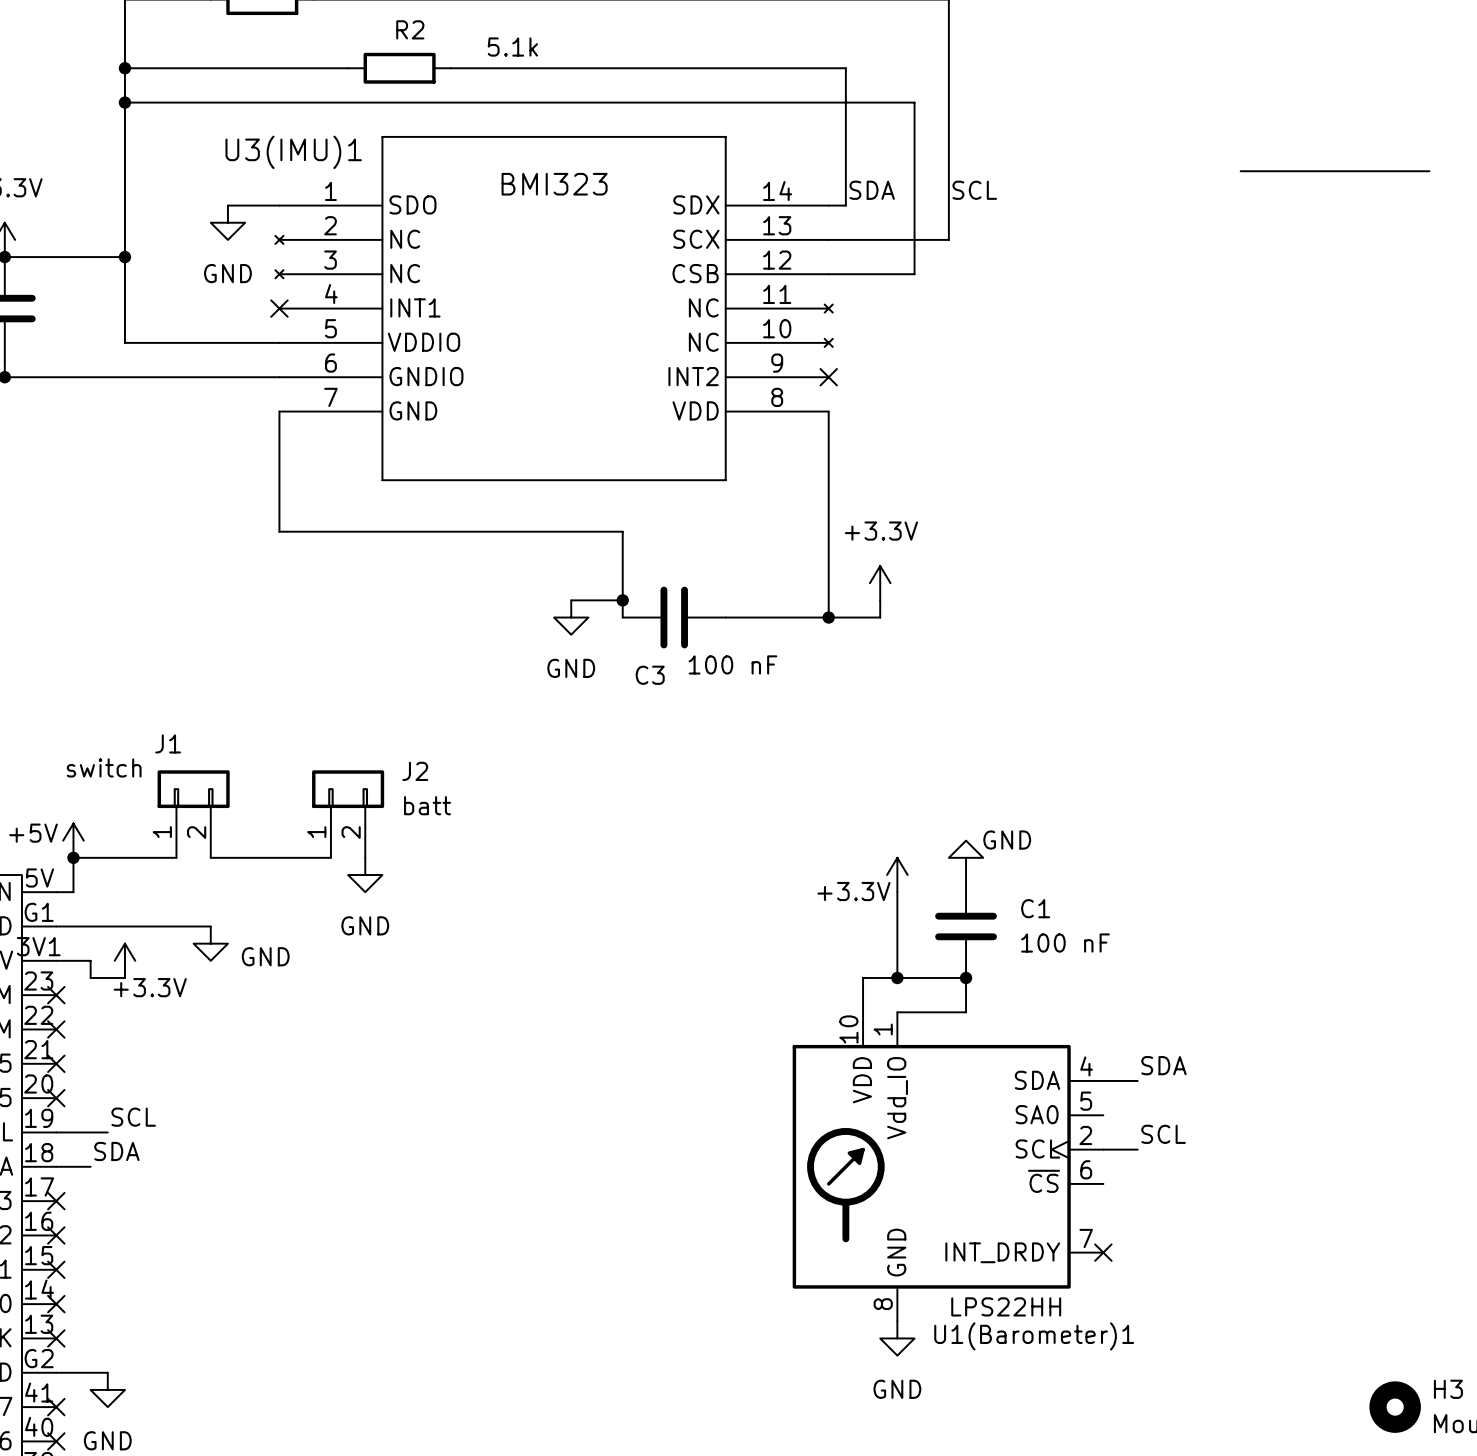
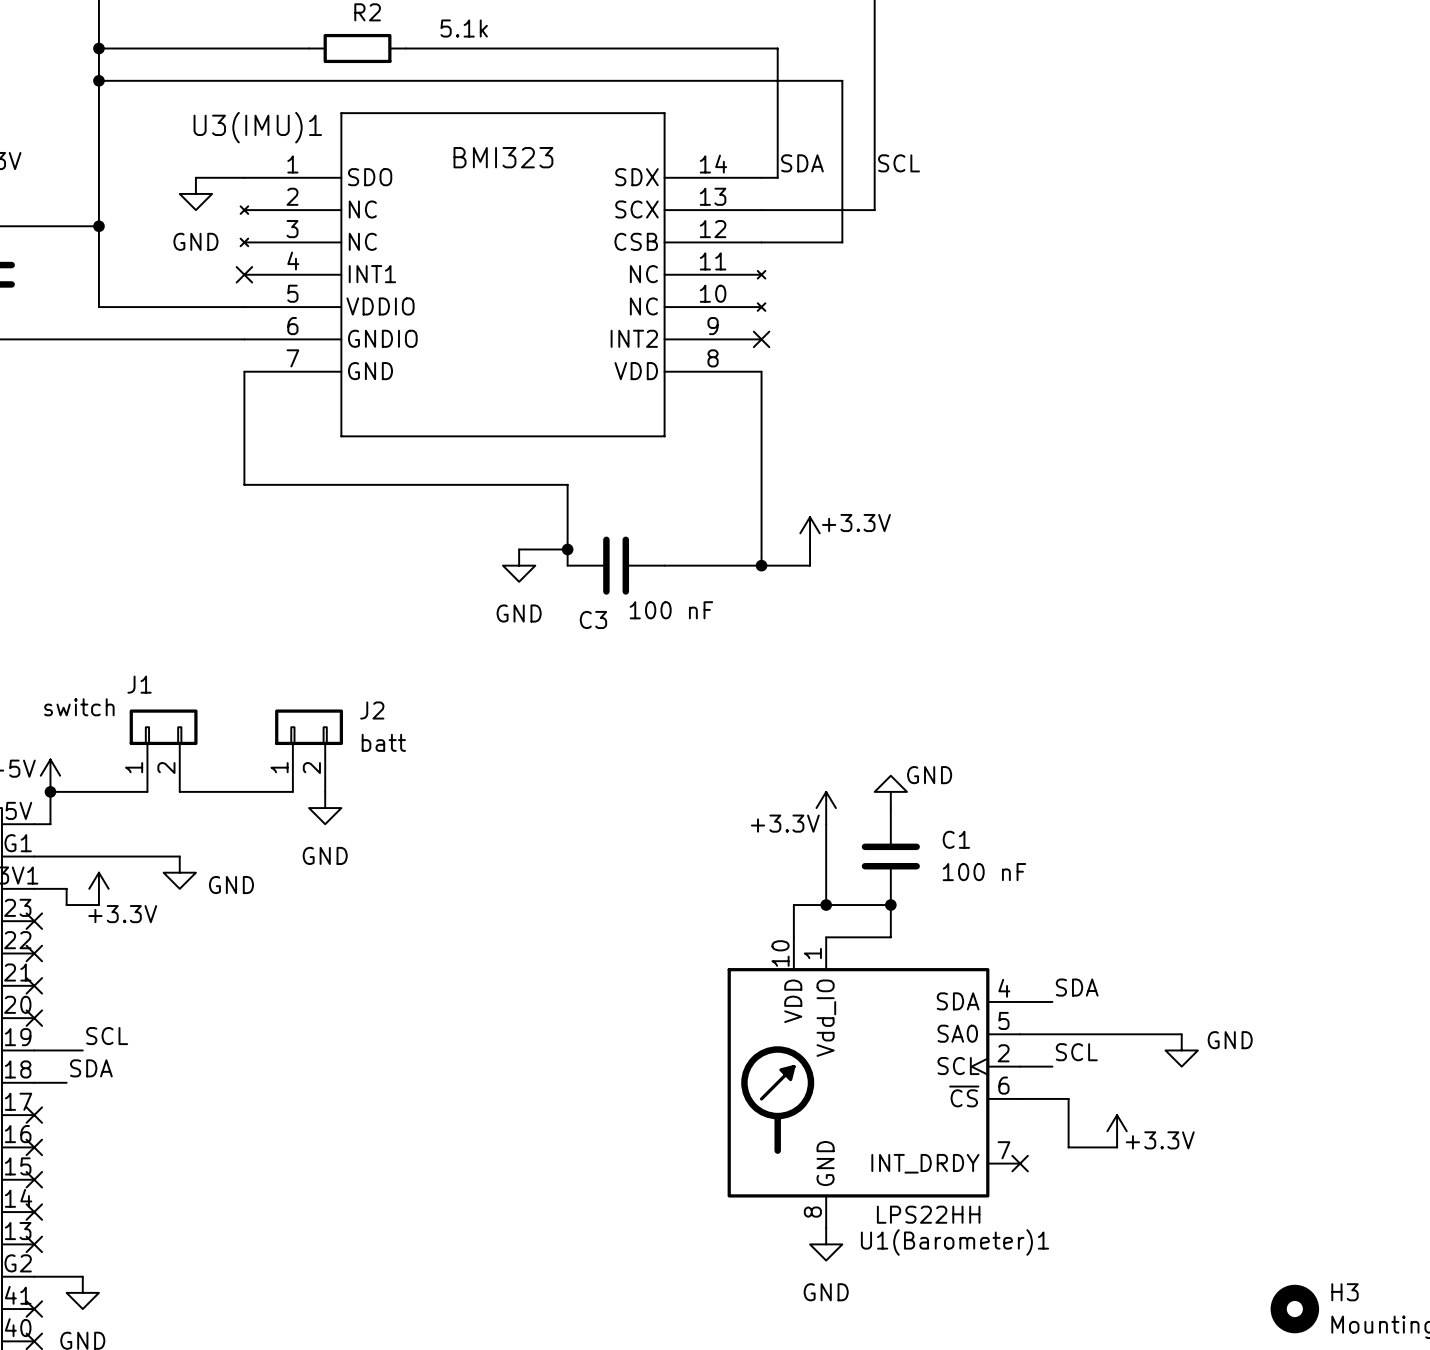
wire: (1240, 171) (1429, 171) -> none
power symbol text position: +3.3V (881, 531) -> +3.3V (856, 523)
wire: none -> (1020, 1034) (1181, 1034)
power symbol: none -> GND (1181, 1050)
wire: none -> (1020, 1098) (1068, 1098) (1068, 1147) (1117, 1147)
power symbol: none -> +3.3V (1117, 1131)

